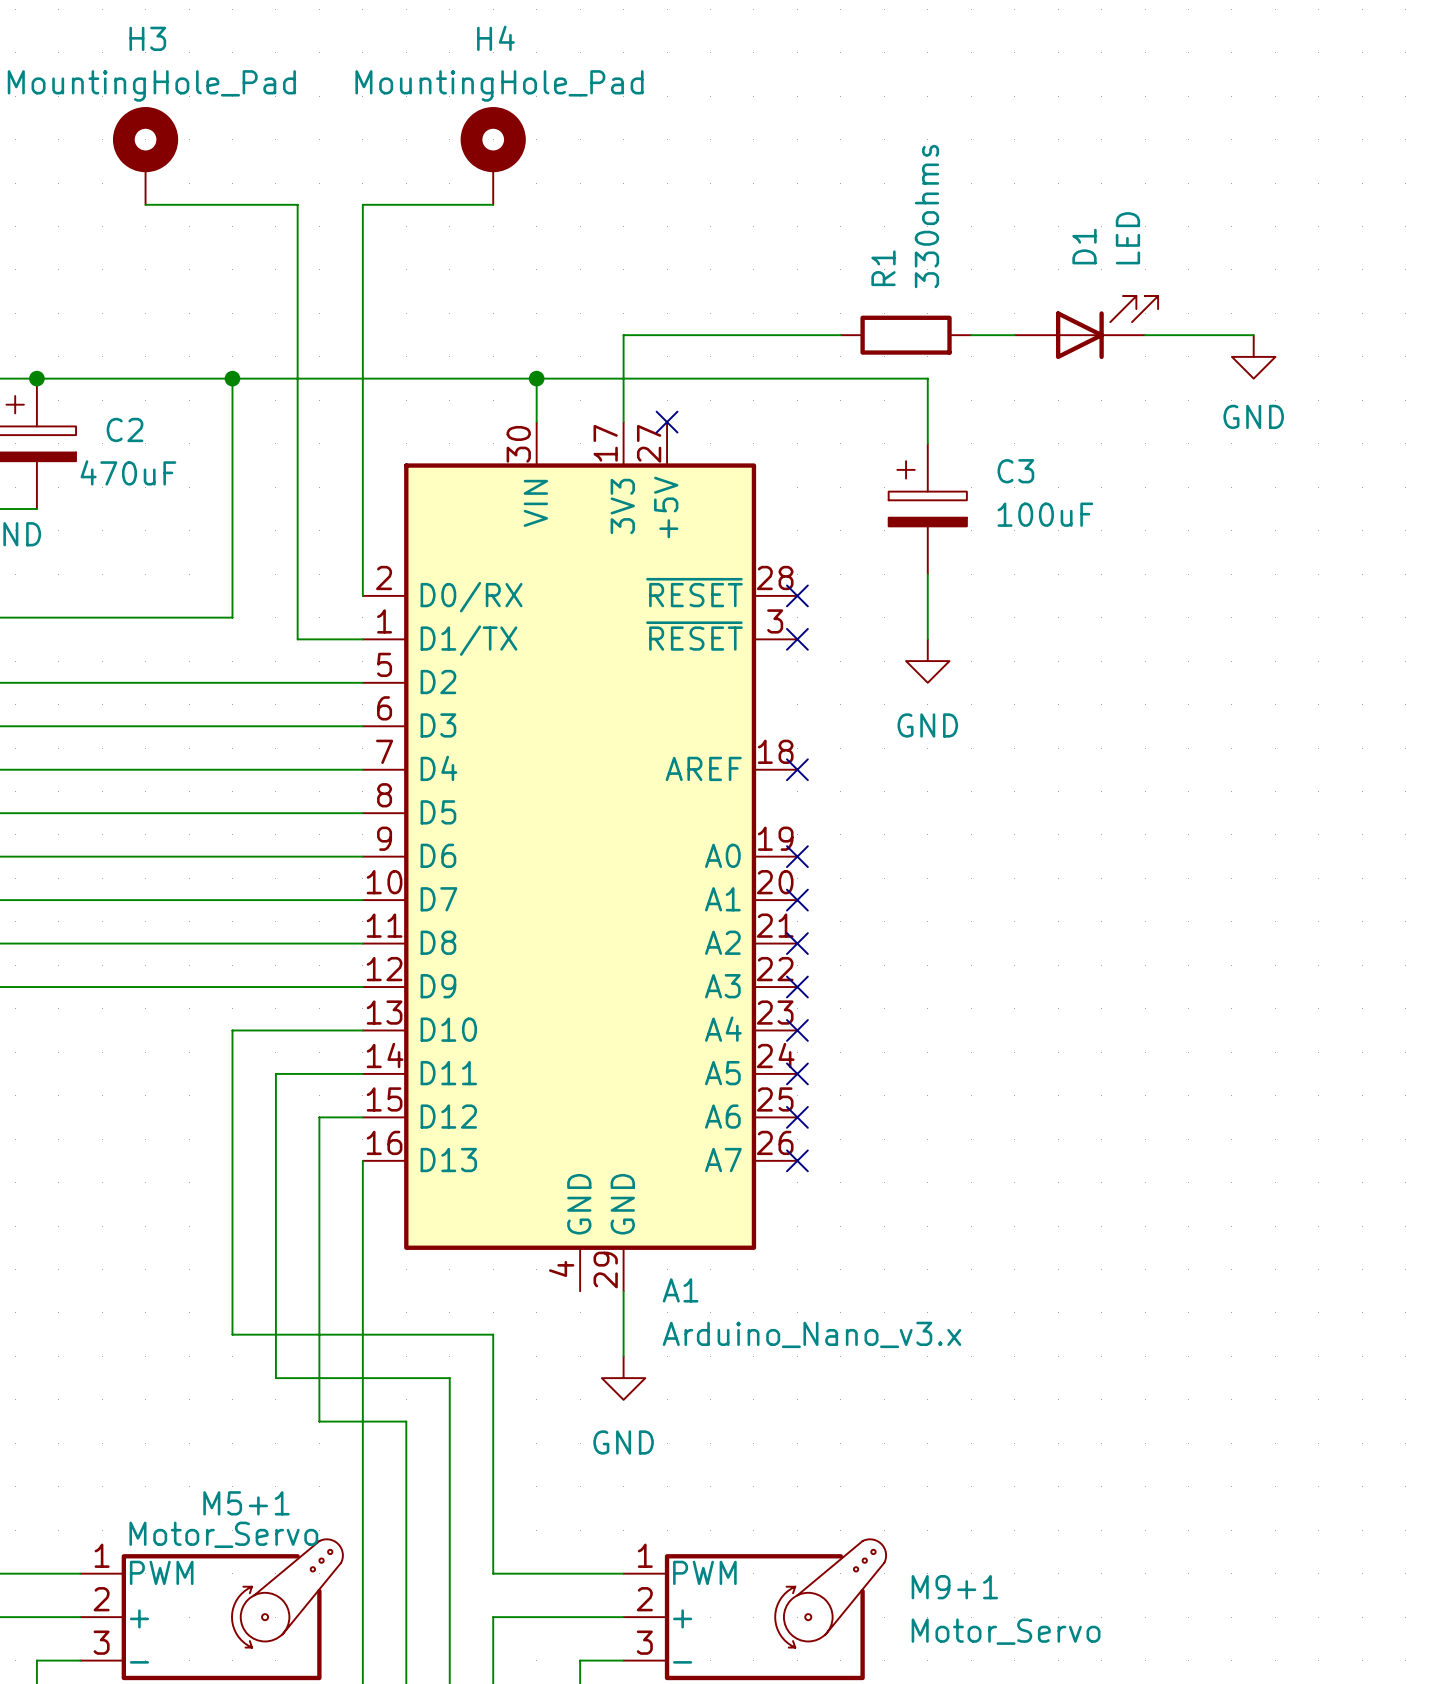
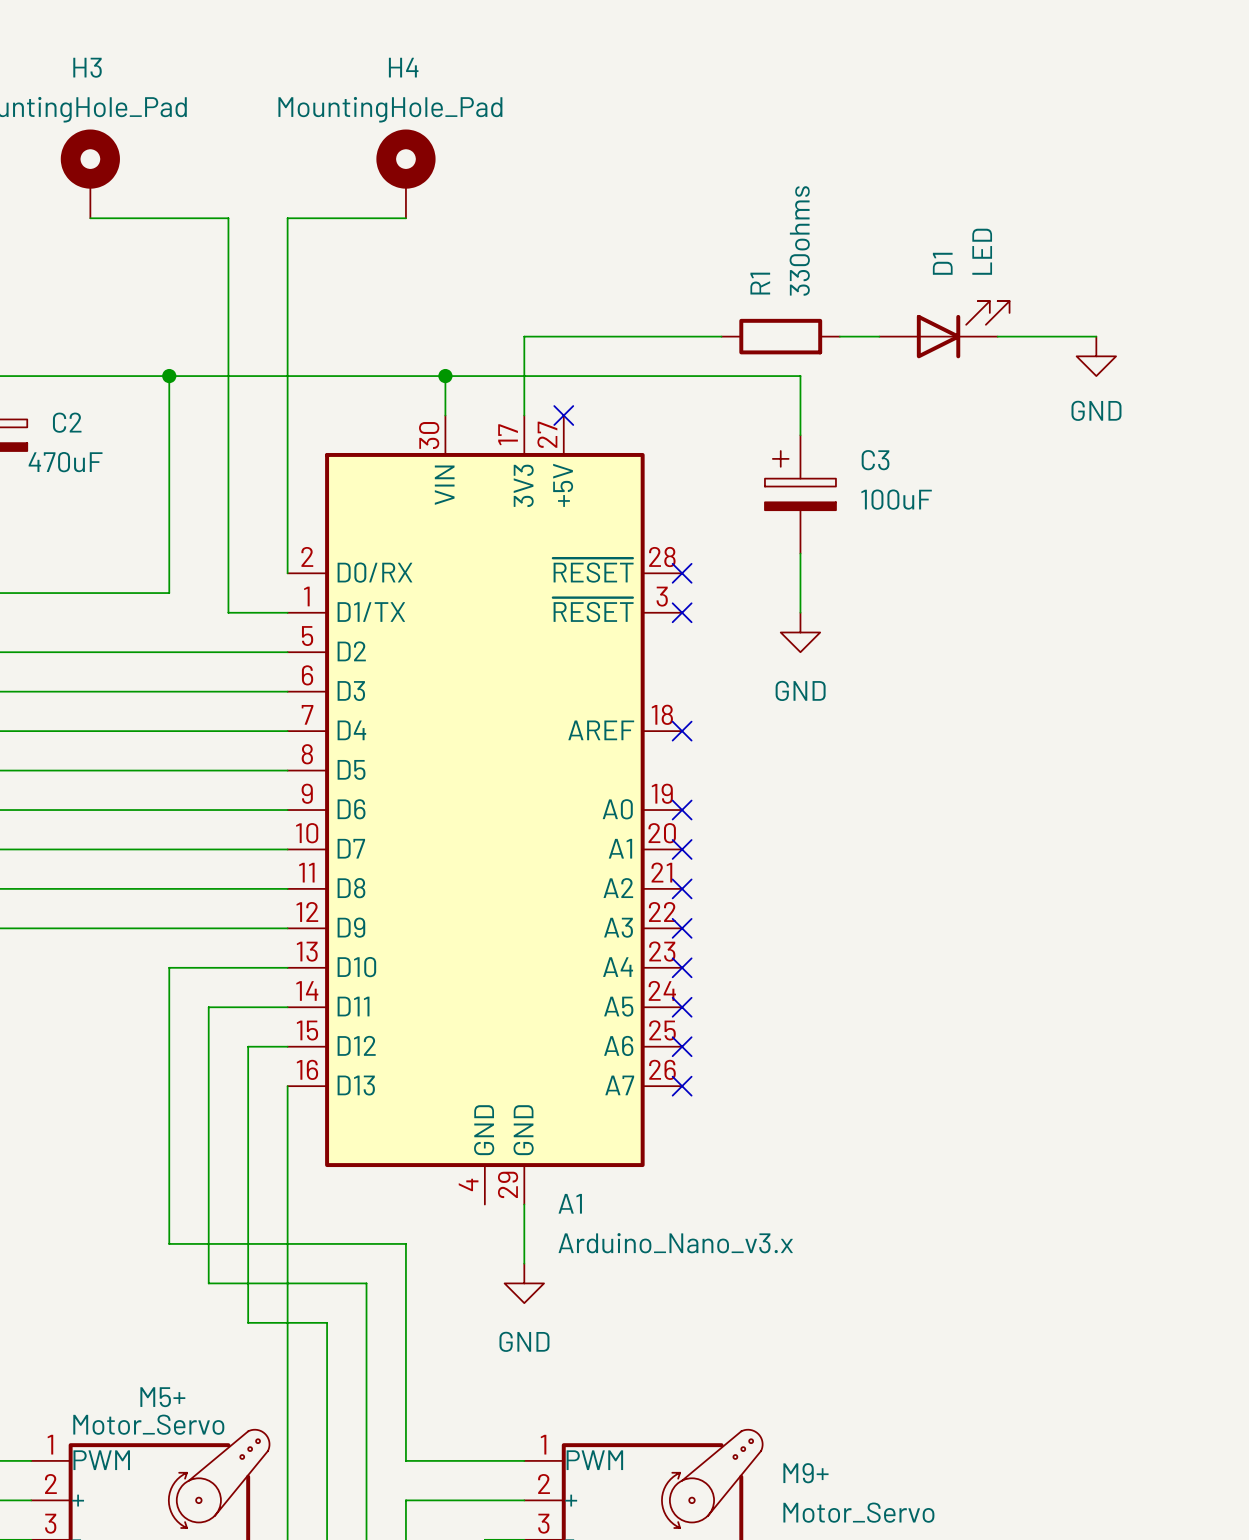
M5+1 name: M5+1 (246, 1503) -> M5+ (162, 1397)
M9+1 name: M9+1 (954, 1587) -> M9+ (805, 1473)

